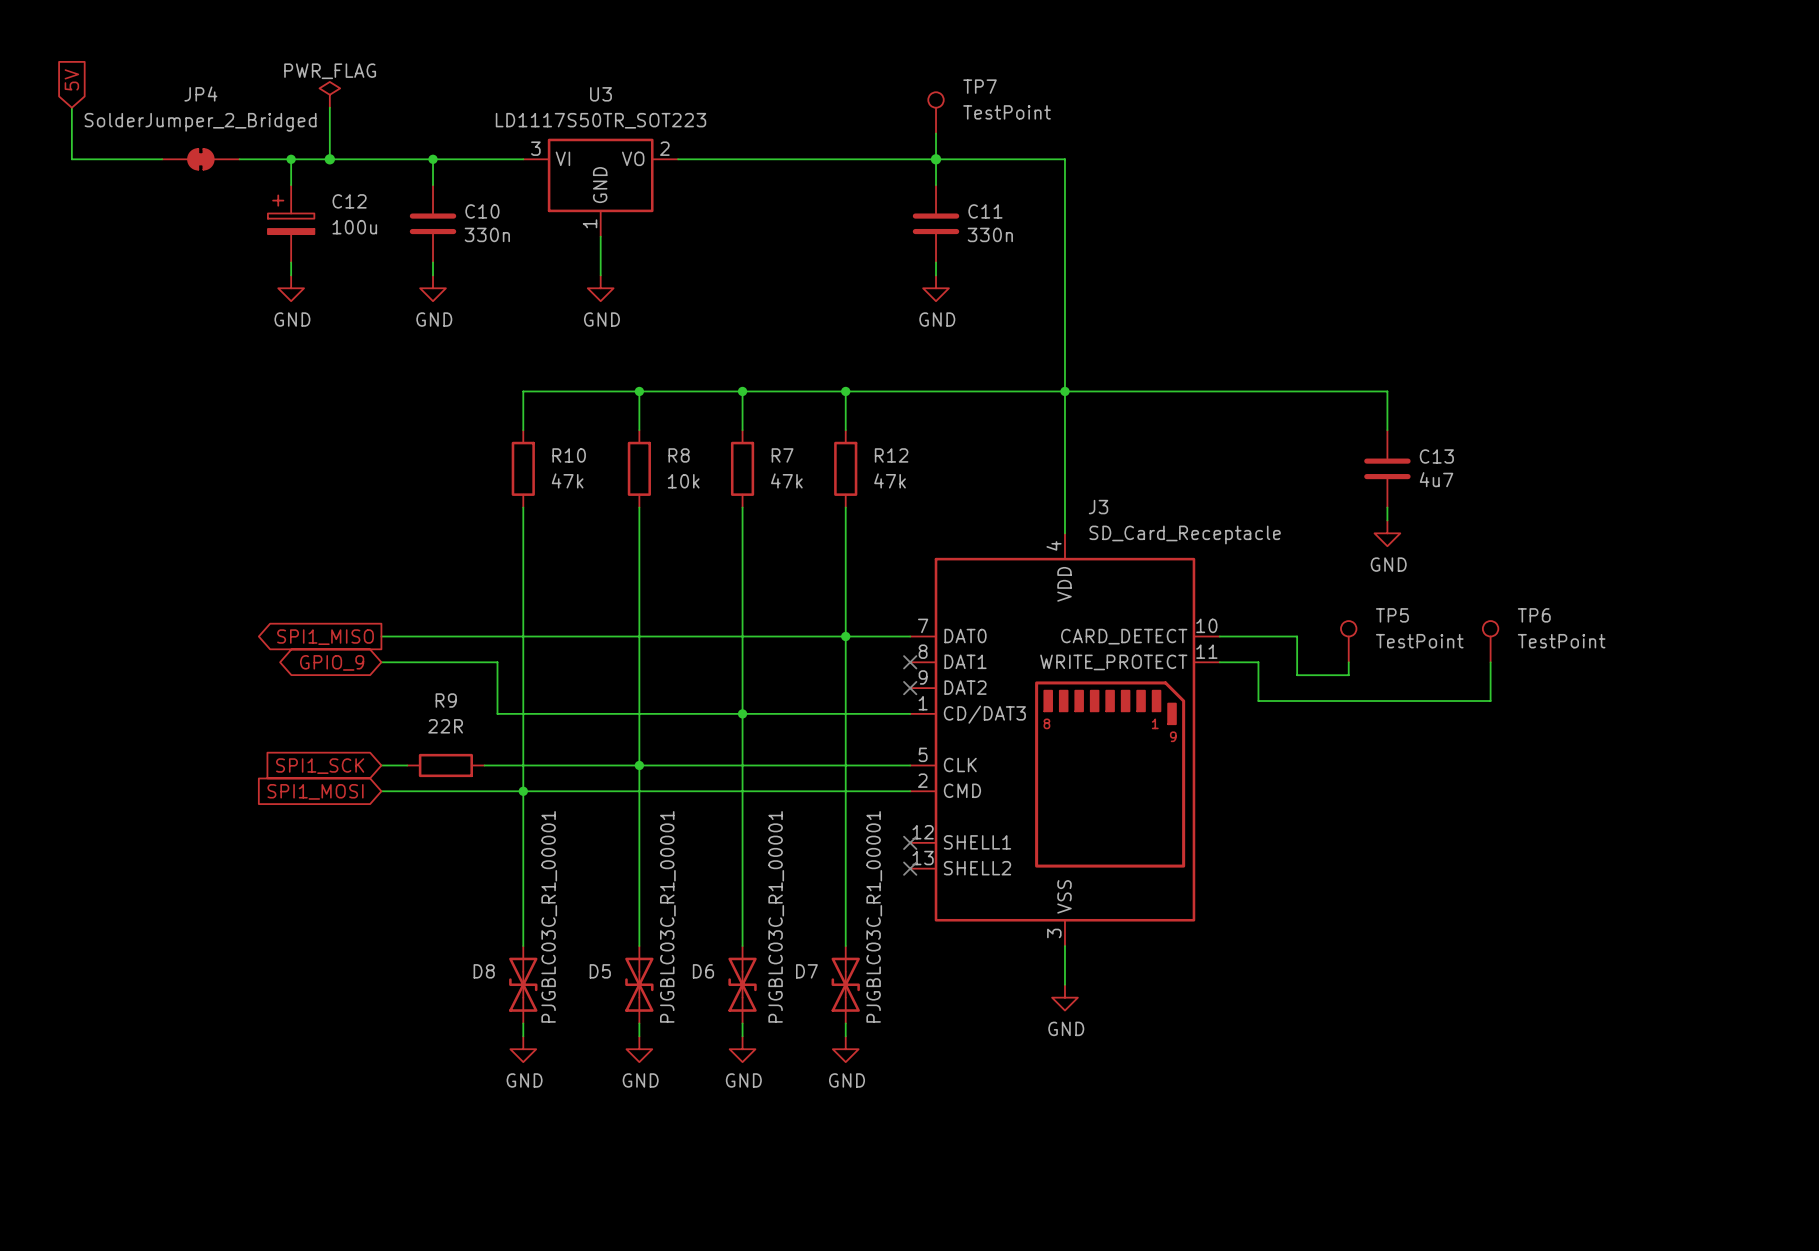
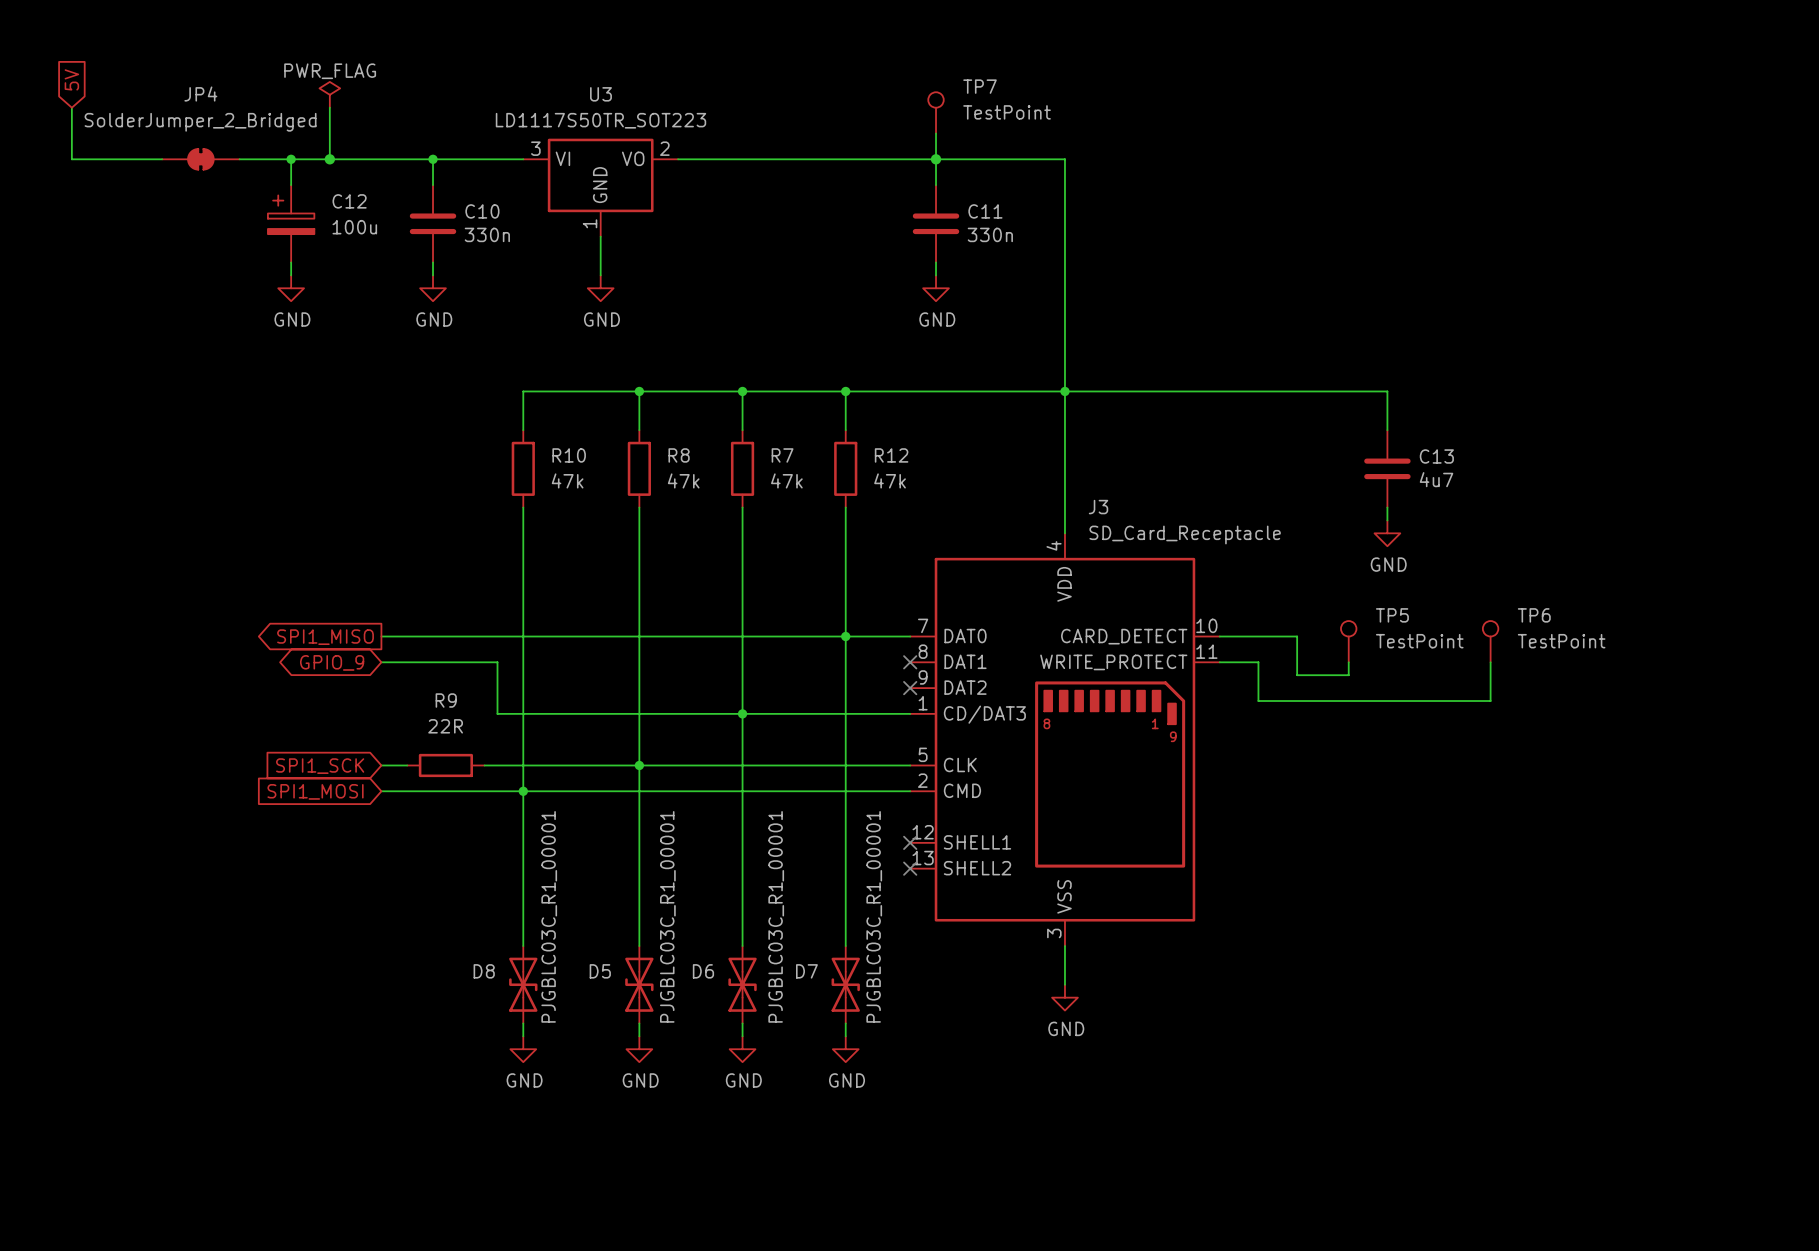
R8 value: 10k (683, 481) -> 47k (683, 480)

